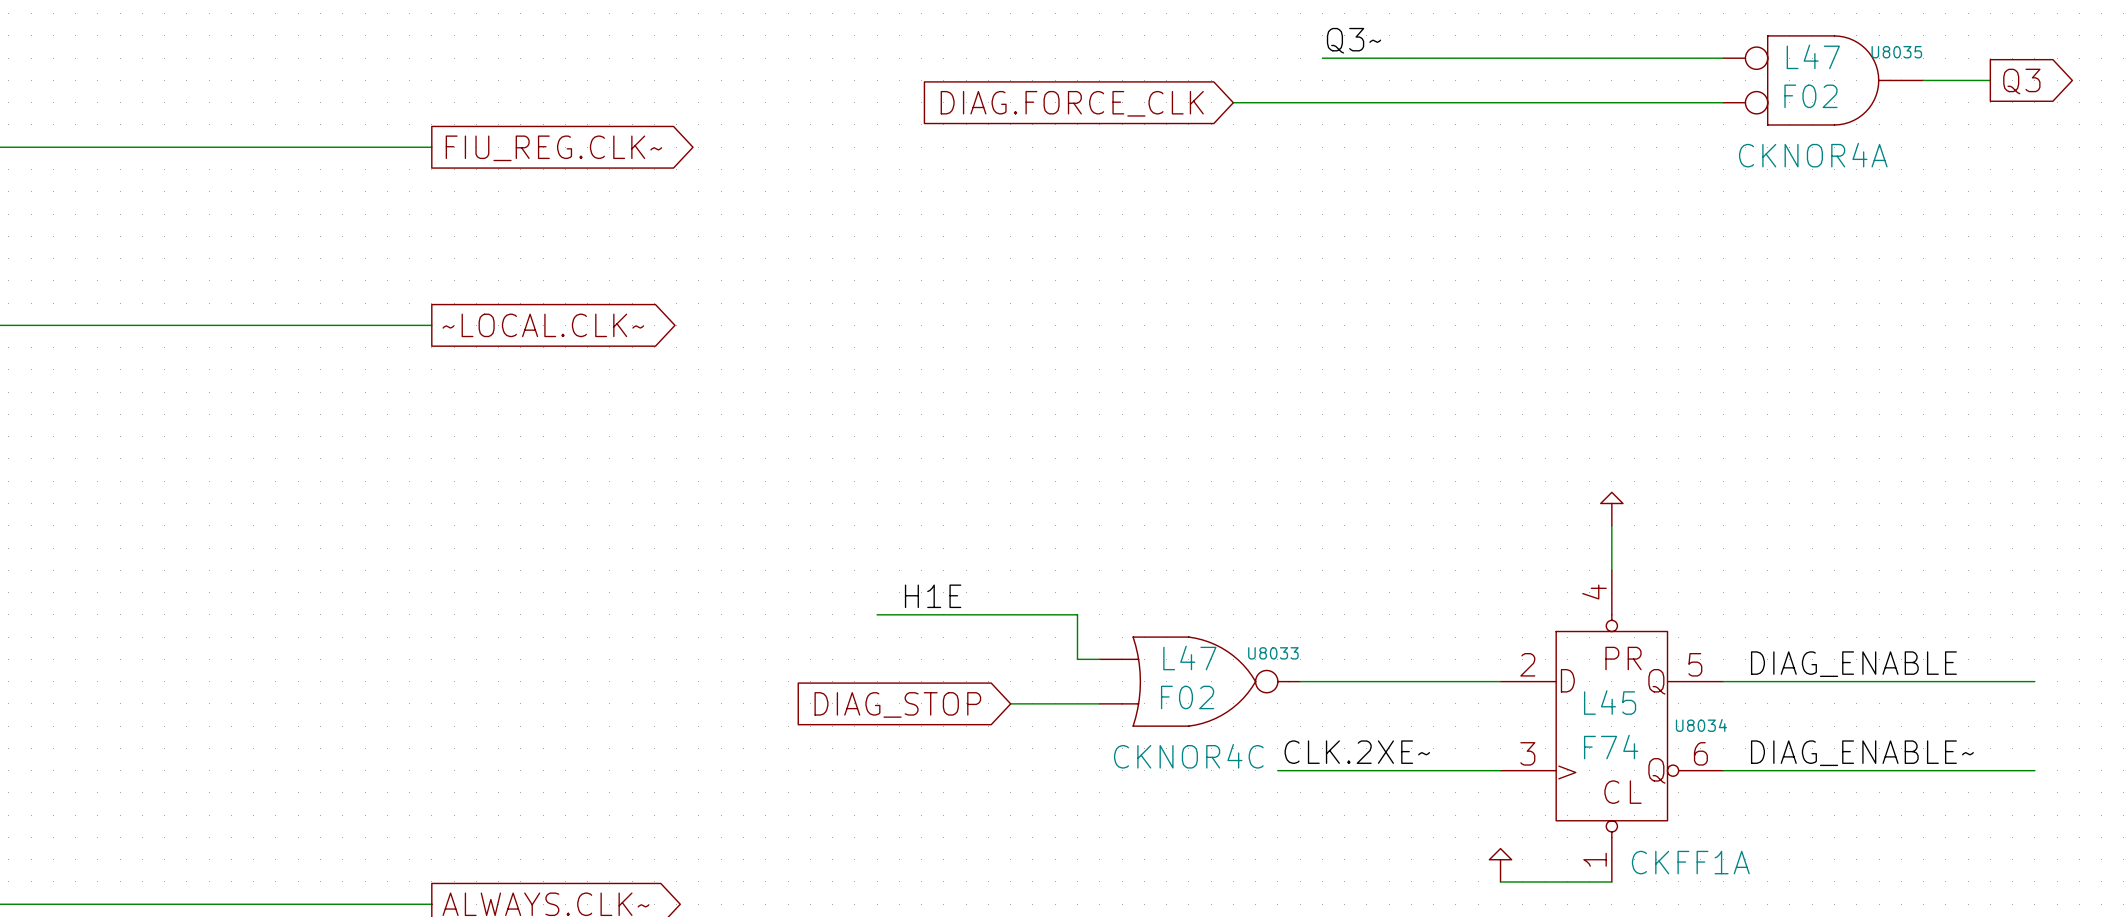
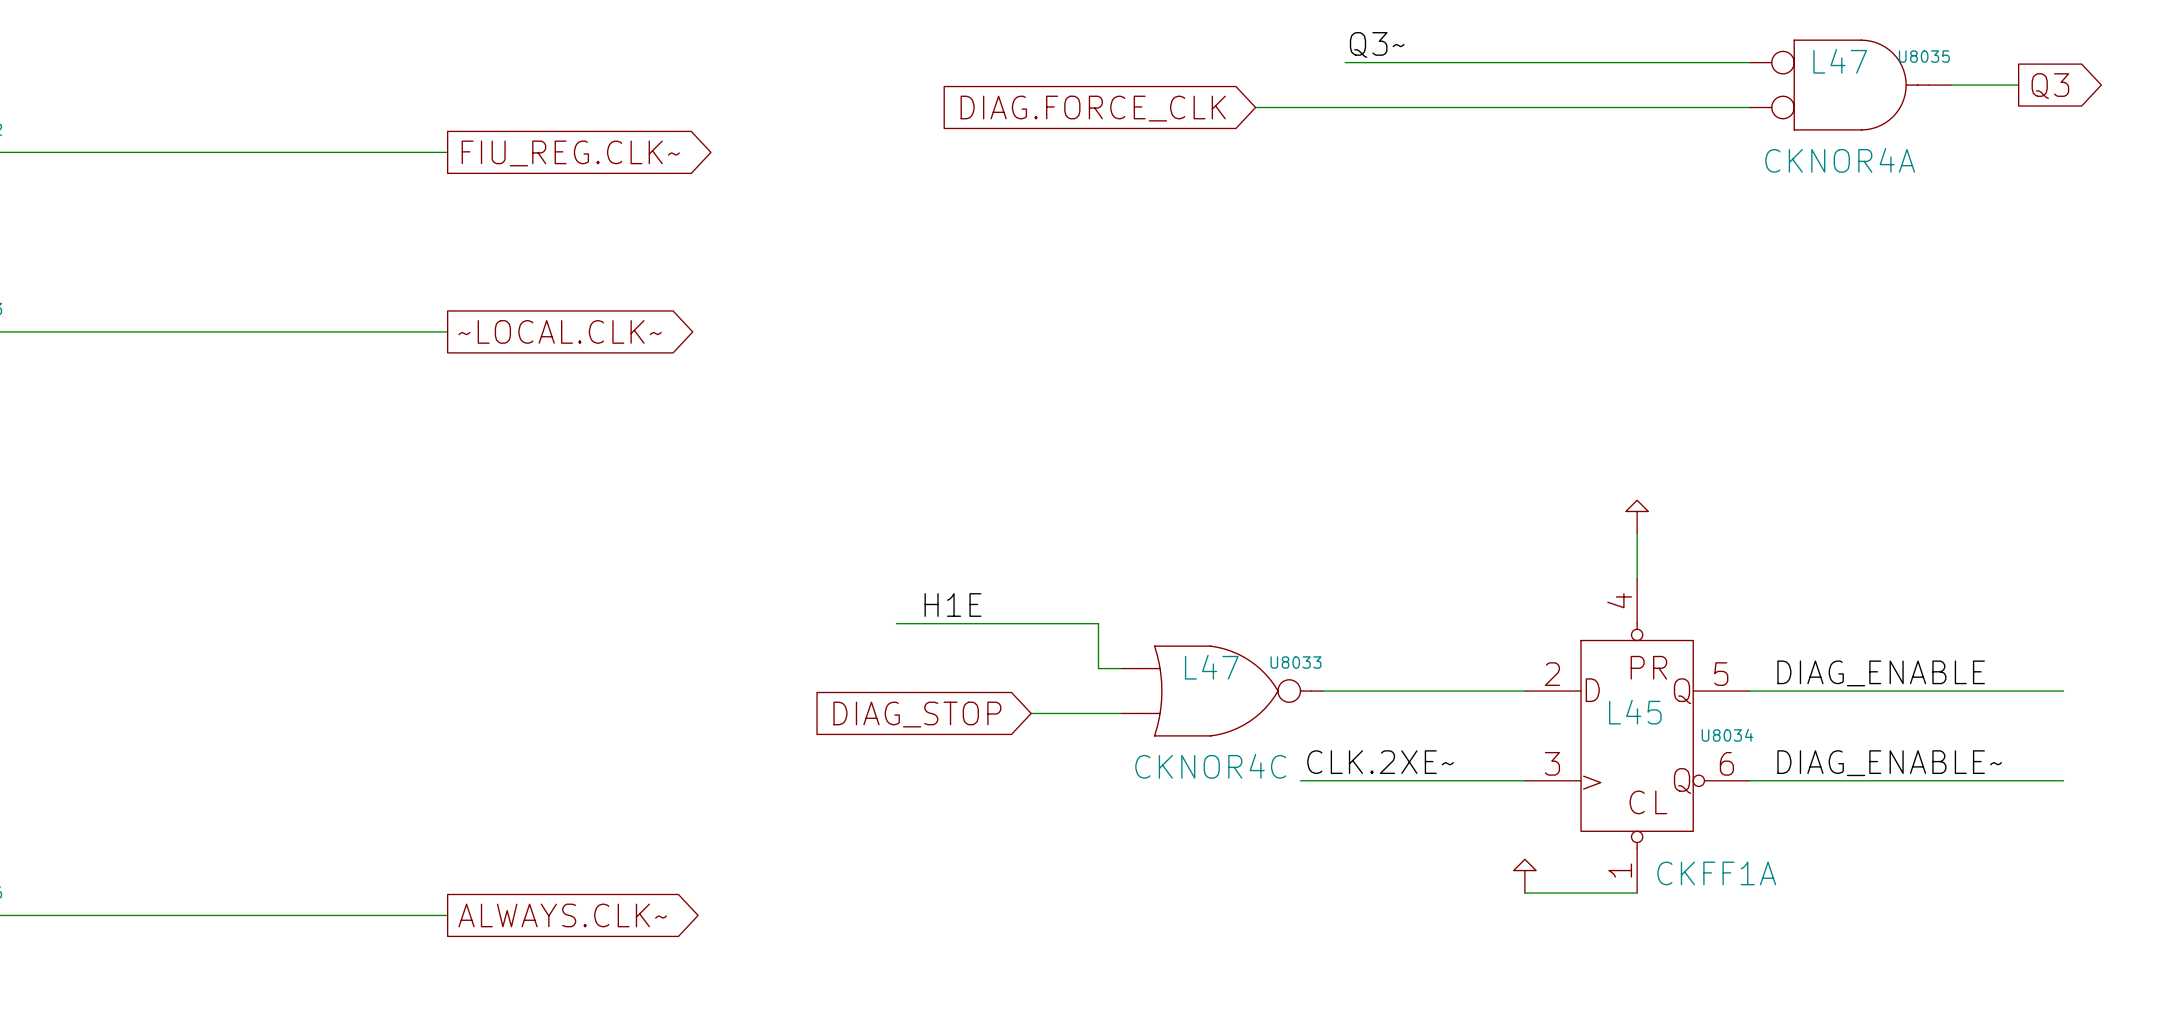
U8035 value: F02 (1810, 96) -> none
U8033 value: F02 (1187, 697) -> none
U8034 value: F74 (1611, 747) -> none

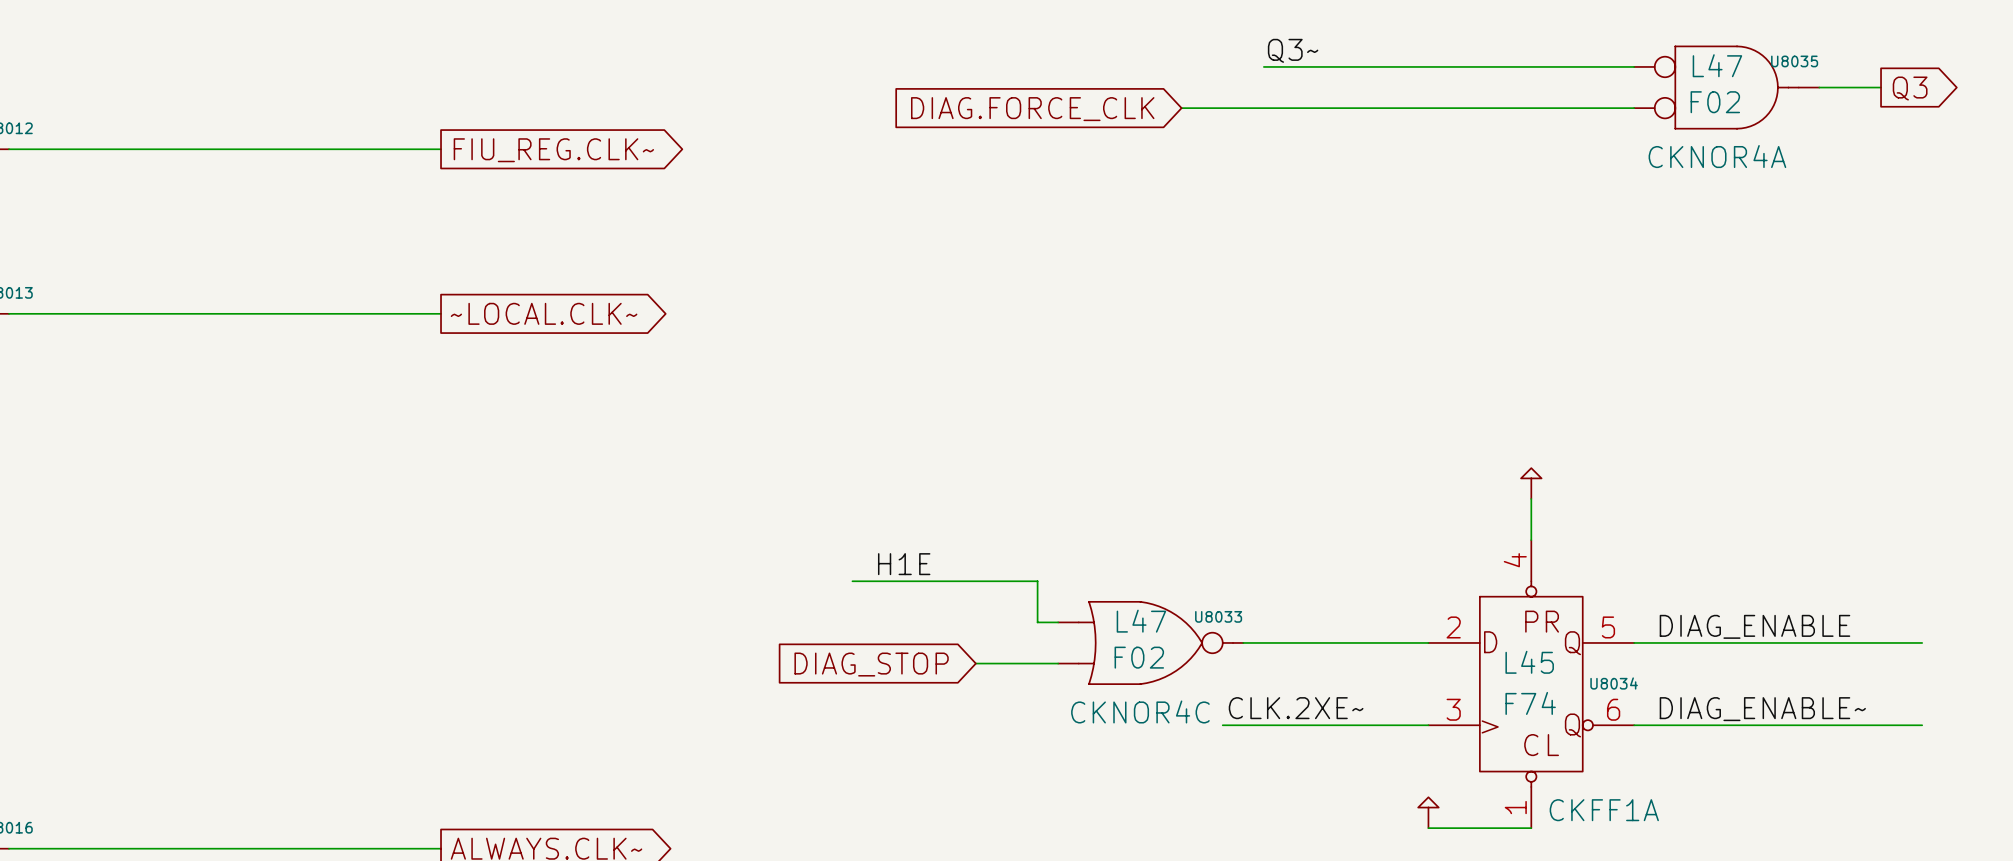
U8035 value: none -> F02 (1715, 102)
U8033 value: none -> F02 (1139, 657)
U8034 value: none -> F74 (1530, 703)

